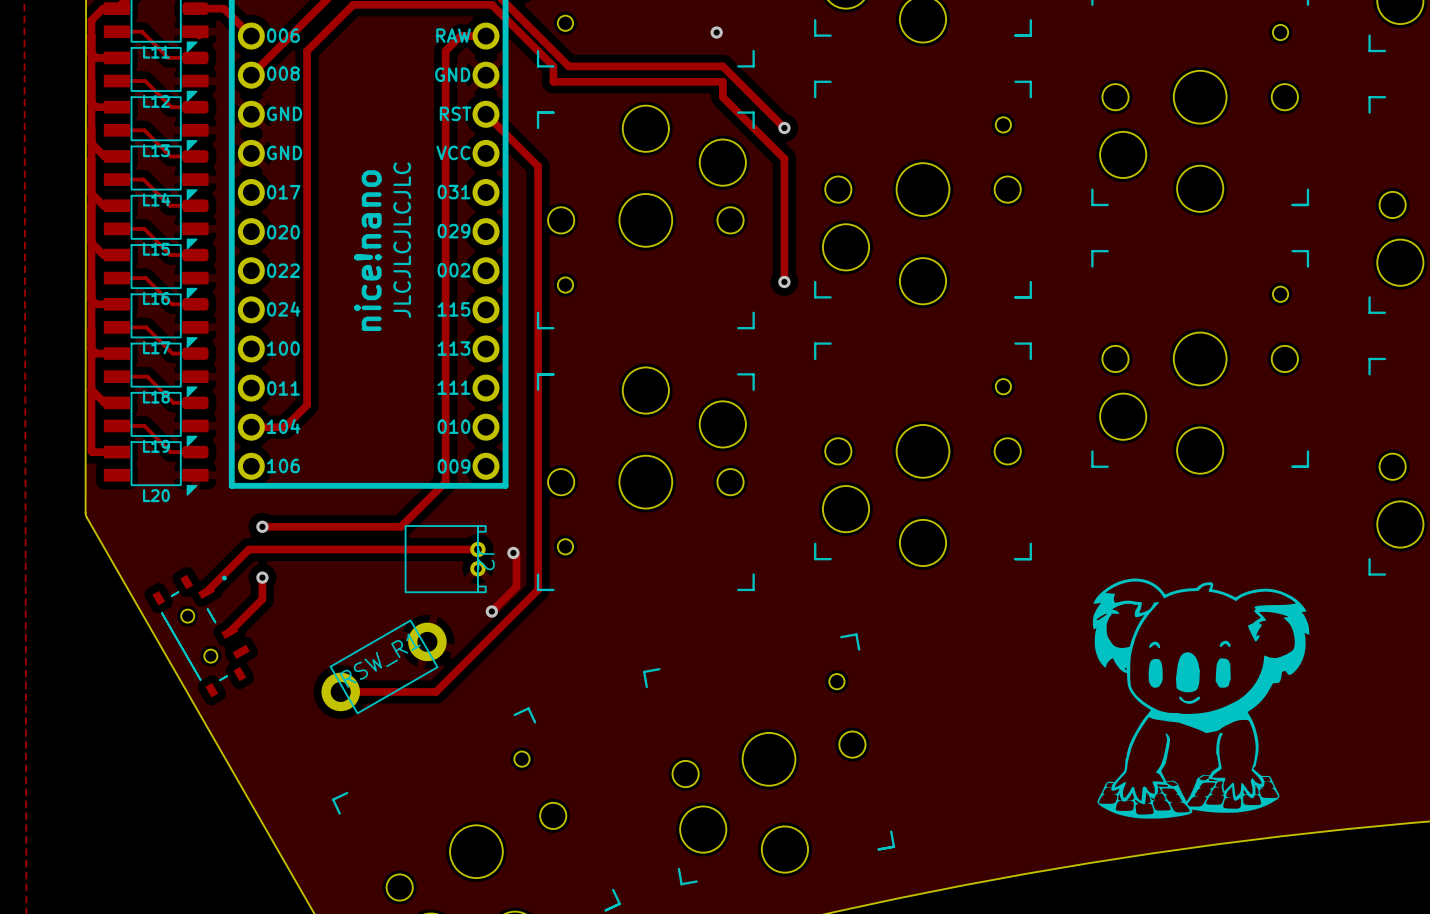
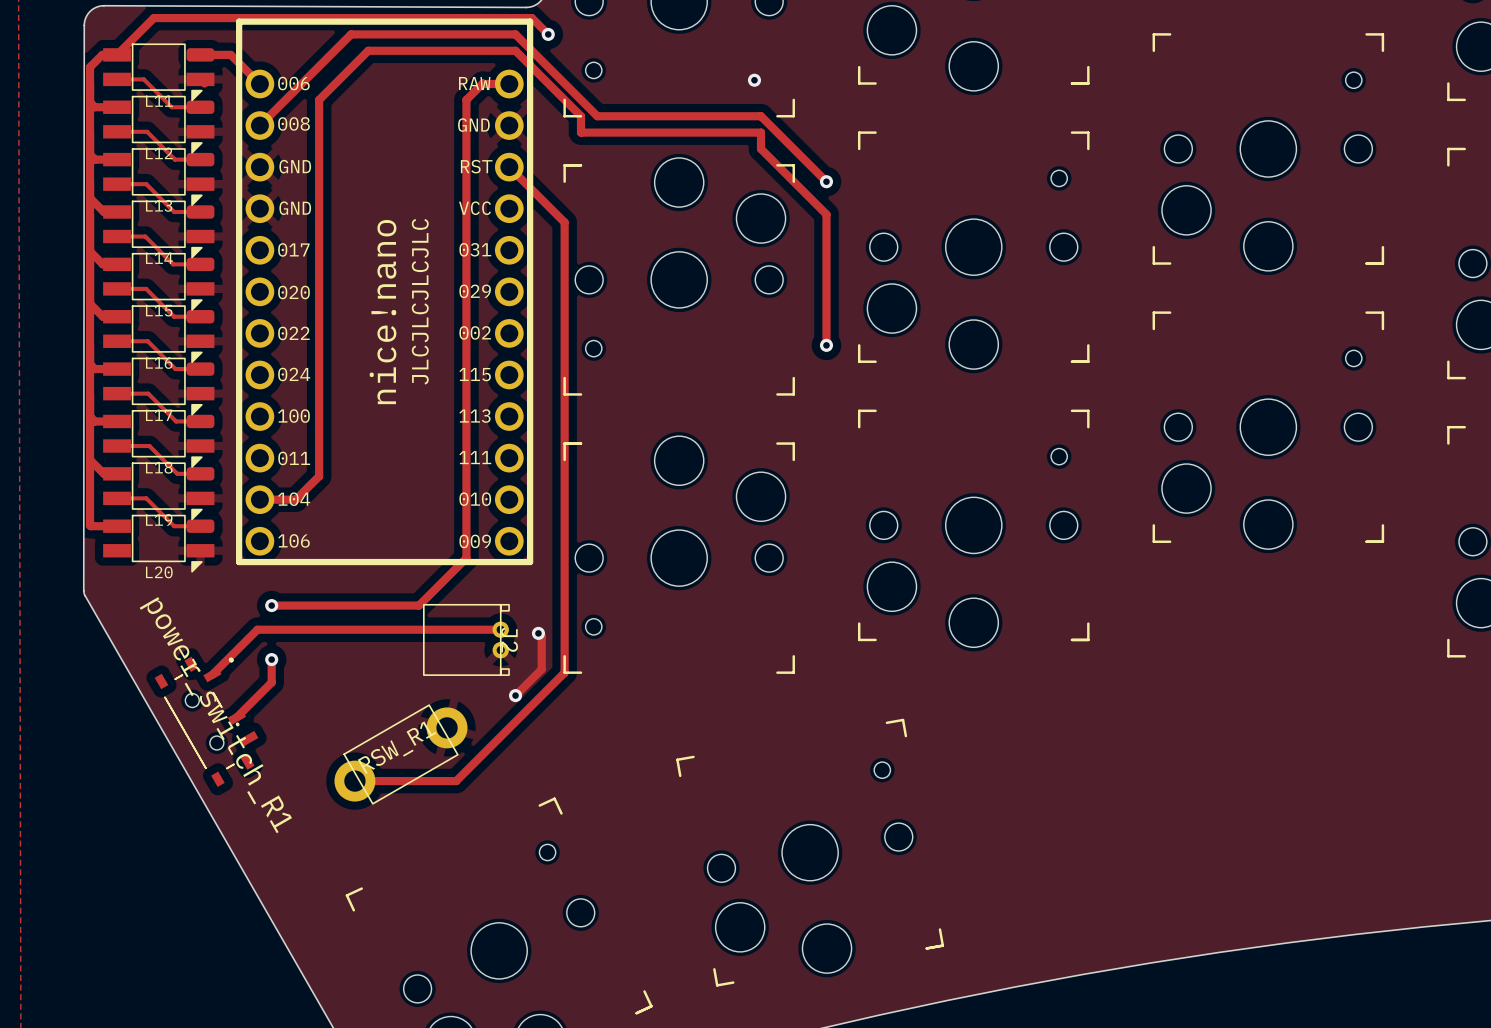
drawing: [1092, 578, 1310, 819] -> none
power_switch_R1 name: none -> power_switch_R1 (215, 715)

